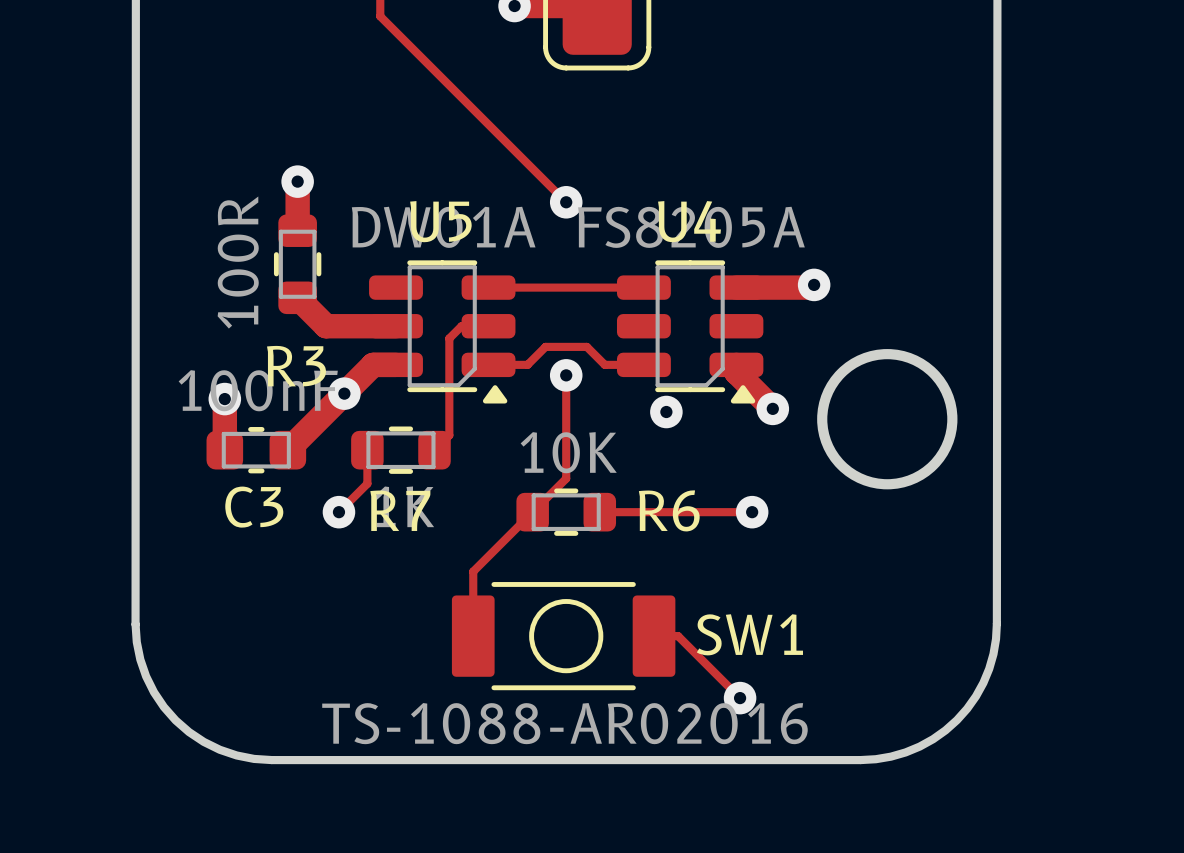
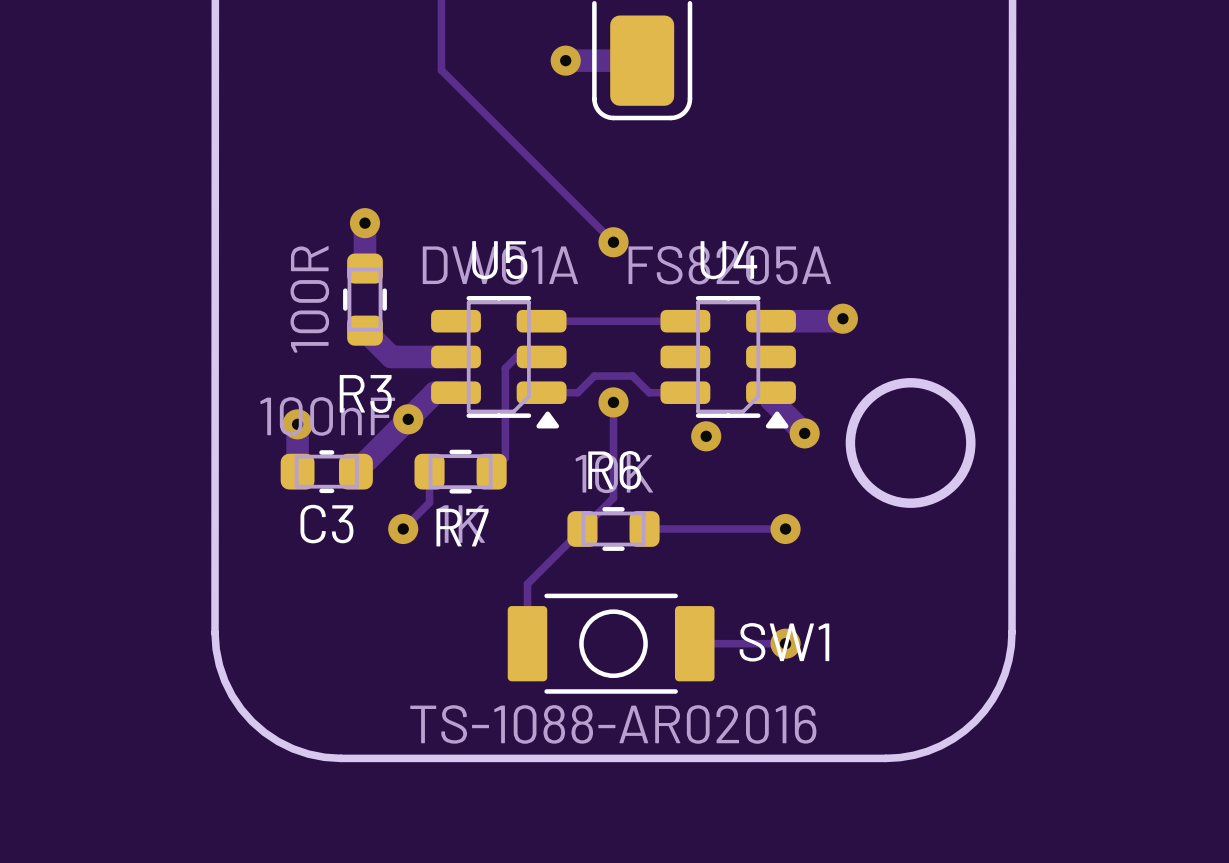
R6 name position: R6 (669, 510) -> R6 (614, 470)
track: (678, 636) (740, 698) -> (717, 643) (785, 643)
via position: (740, 698) -> (785, 643)

